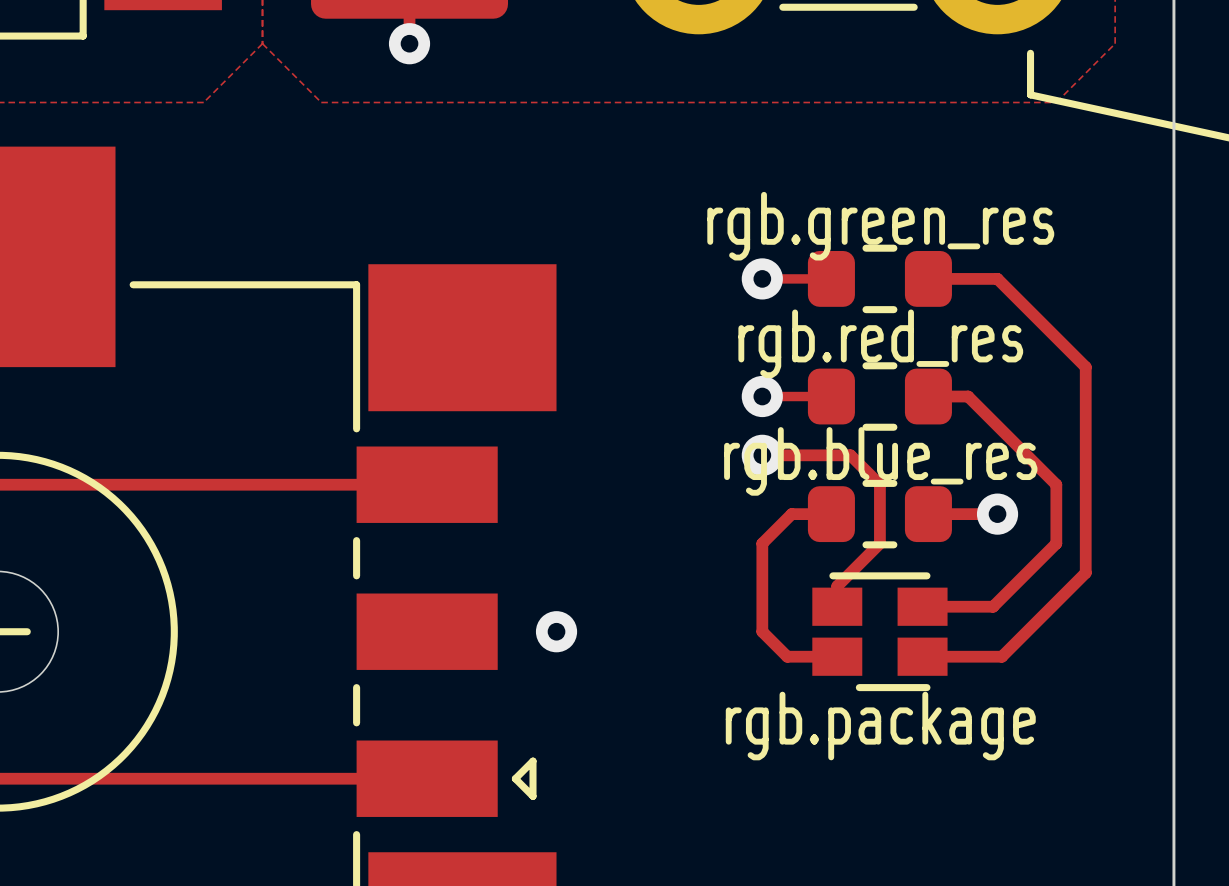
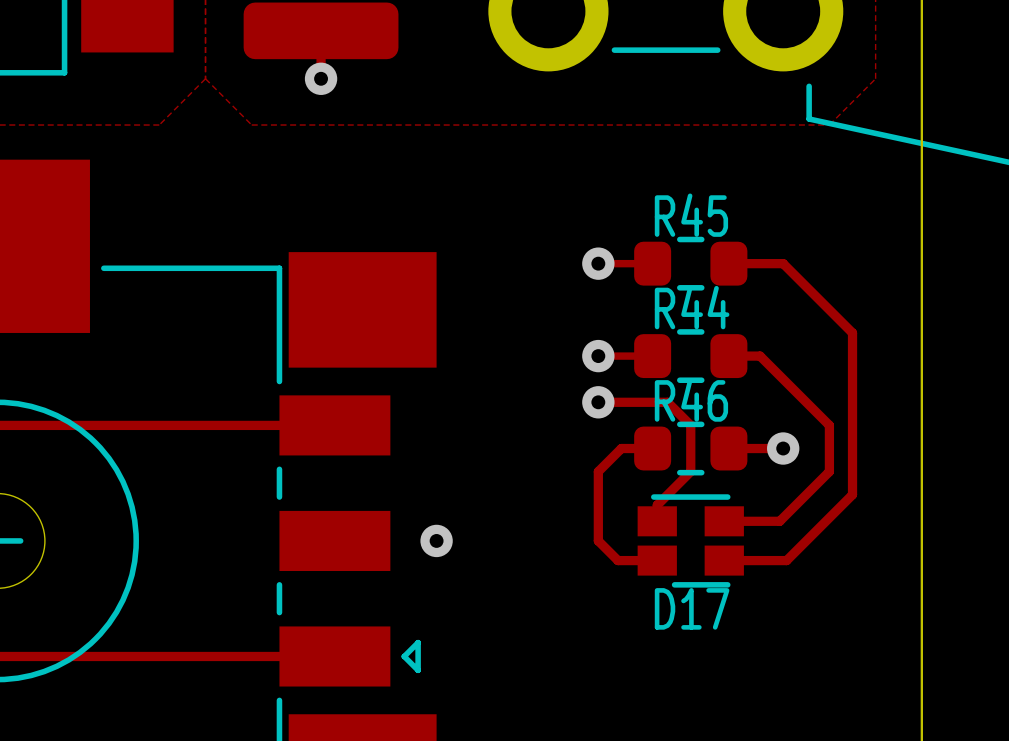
rgb.green_res name: rgb.green_res (880, 226) -> R45 (691, 215)
rgb.red_res name: rgb.red_res (880, 343) -> R44 (692, 307)
rgb.blue_res name: rgb.blue_res (880, 461) -> R46 (691, 400)
rgb.package name: rgb.package (880, 726) -> D17 (692, 608)

